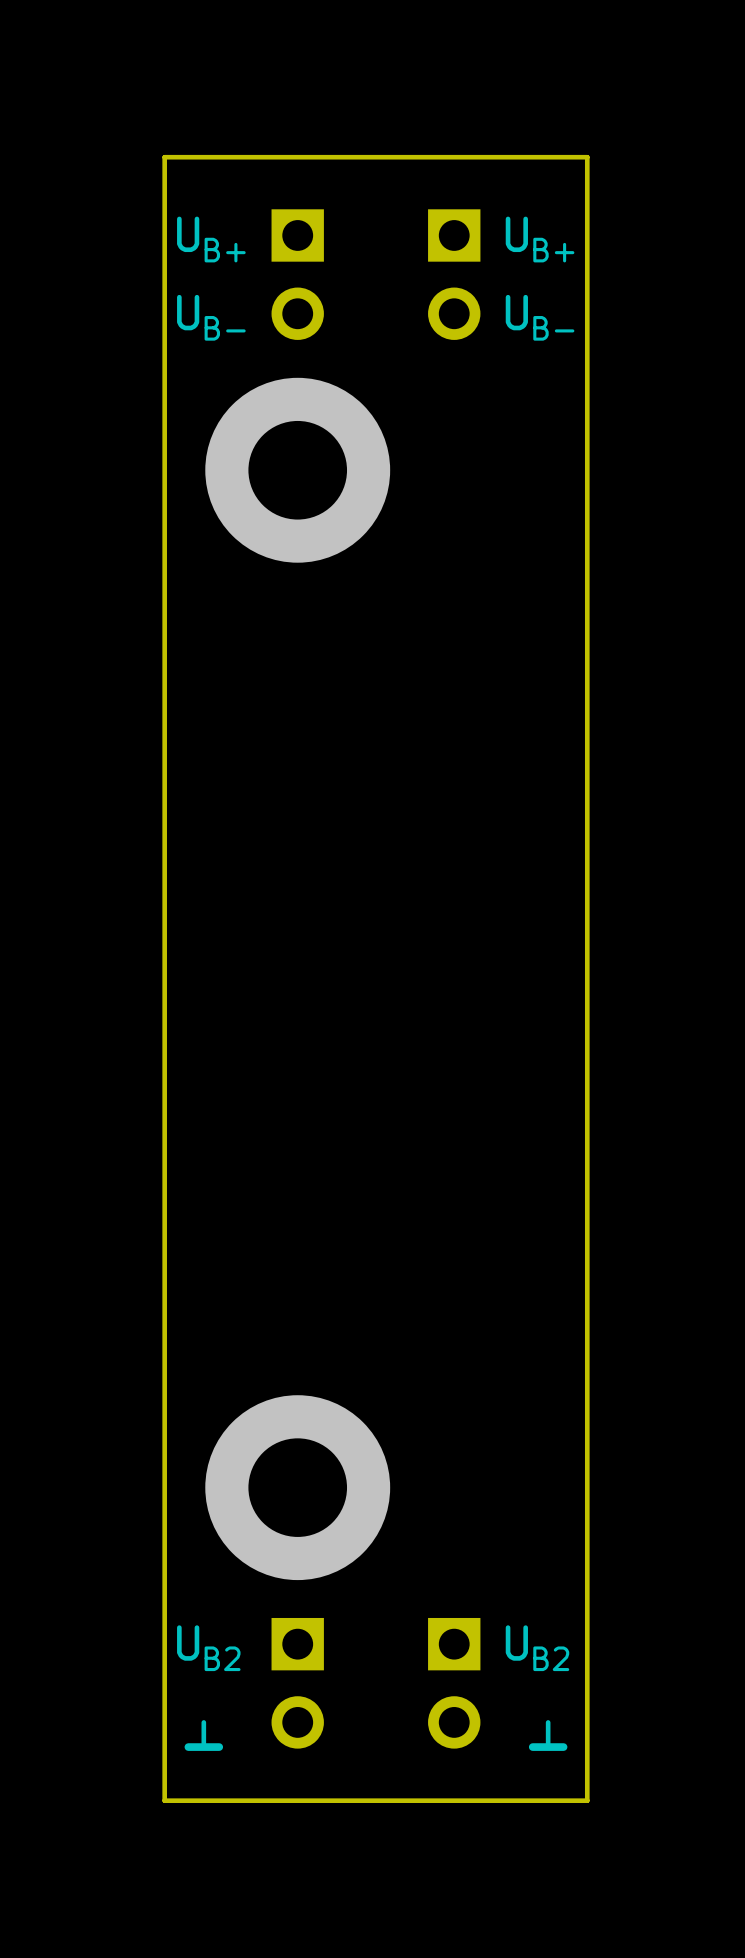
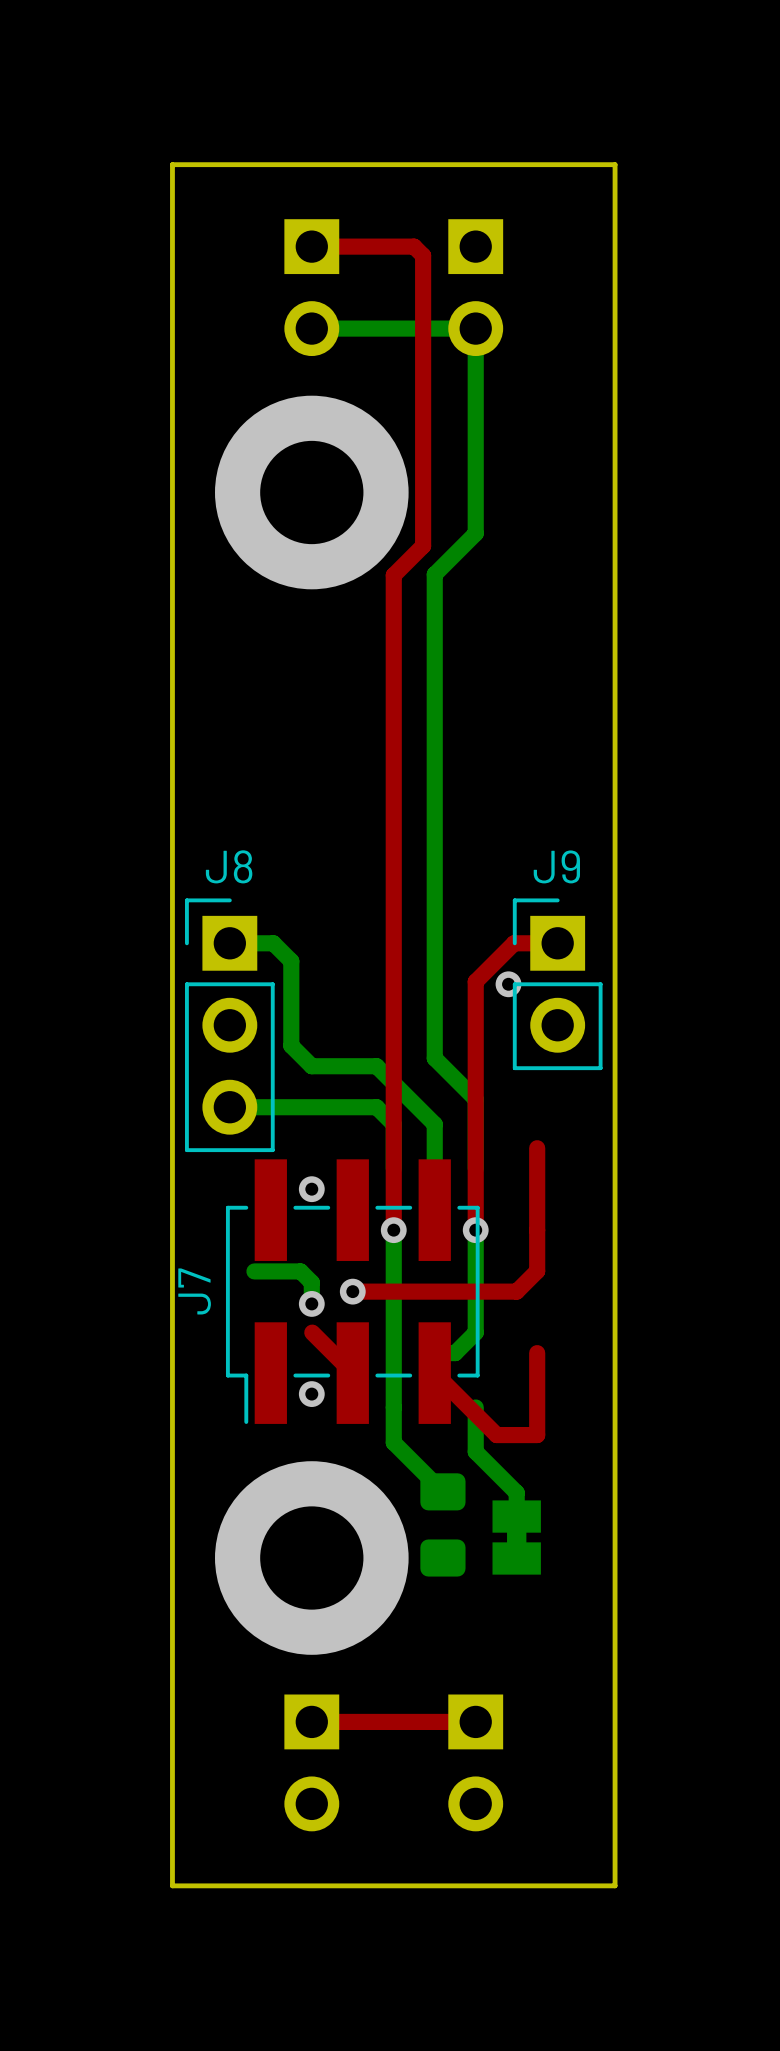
drawing: [177, 216, 246, 341] -> none
drawing: [505, 216, 575, 341] -> none
top track: none -> (311, 246) (414, 246) (423, 255) (423, 545) (393, 575) (393, 1230)
bottom track: none -> (311, 328) (475, 328) (475, 533) (434, 574) (434, 1058) (475, 1099) (475, 1168)
bottom track: none -> (229, 943) (273, 943) (291, 961) (291, 1045) (311, 1066) (376, 1066) (434, 1124) (434, 1168)
top track: none -> (557, 943) (514, 943) (475, 981) (475, 1230)
via: none -> (508, 984)
J9: none -> (557, 984)
J8: none -> (229, 1025)
bottom track: none -> (229, 1107) (376, 1107) (393, 1124) (393, 1168)
top track: none -> (537, 1148) (537, 1271) (516, 1291) (352, 1291)
via: none -> (311, 1189)
bottom track: none -> (393, 1230) (393, 1442) (442, 1491)
via: none -> (393, 1230)
bottom track: none -> (475, 1230) (475, 1332) (455, 1353) (444, 1353) (434, 1363) (434, 1407)
via: none -> (475, 1230)
bottom track: none -> (254, 1271) (300, 1271) (311, 1282) (311, 1303)
J7: none -> (352, 1291)
via: none -> (352, 1291)
via: none -> (311, 1303)
top track: none -> (312, 1332) (352, 1373)
top track: none -> (537, 1353) (537, 1435) (496, 1435) (434, 1373)
via: none -> (311, 1394)
bottom track: none -> (475, 1407) (475, 1451) (516, 1492) (516, 1516)
part: none -> (442, 1524)
part: none -> (516, 1537)
drawing: [177, 1625, 241, 1672] -> none
drawing: [505, 1625, 570, 1672] -> none
top track: none -> (311, 1721) (475, 1721)
drawing: [184, 1720, 224, 1751] -> none
drawing: [528, 1720, 568, 1751] -> none

